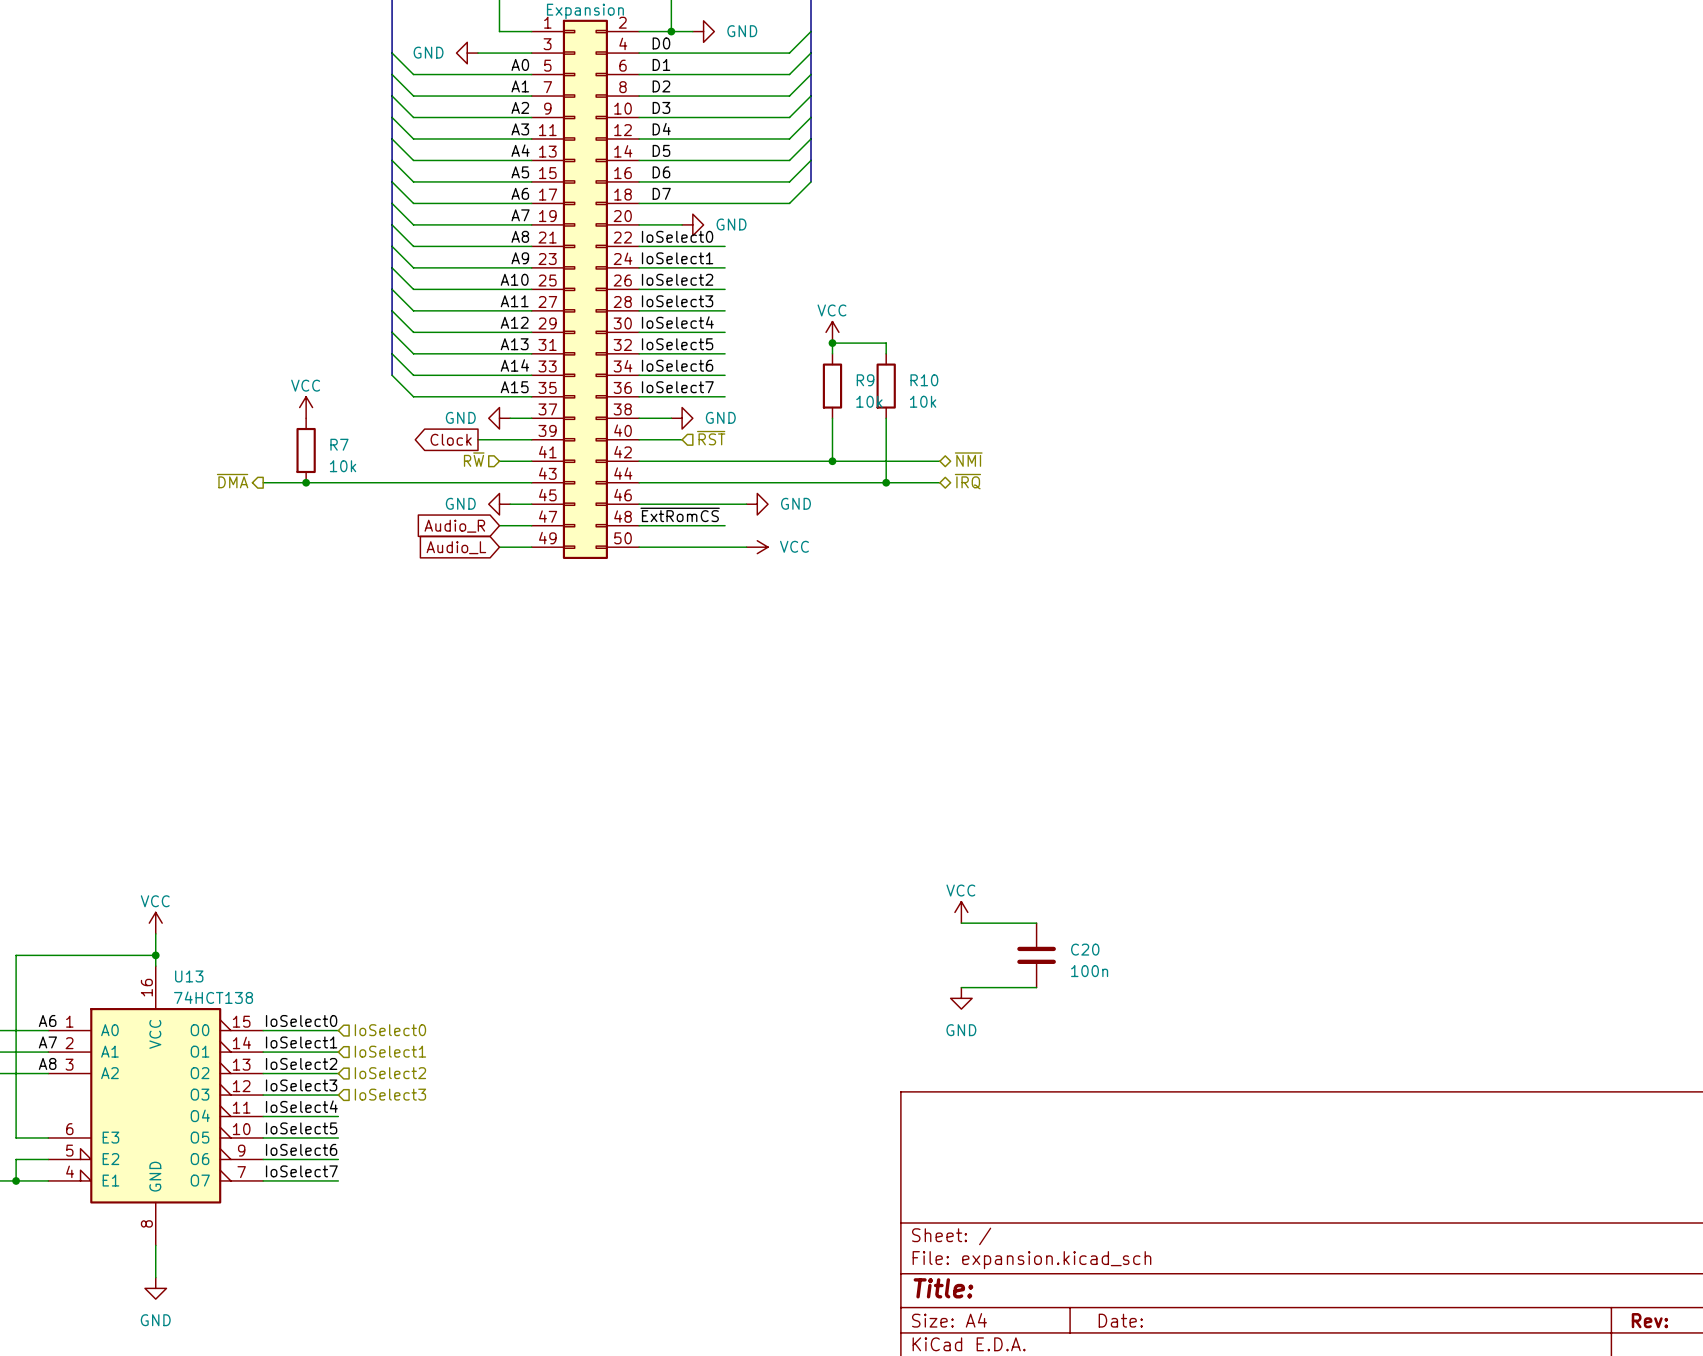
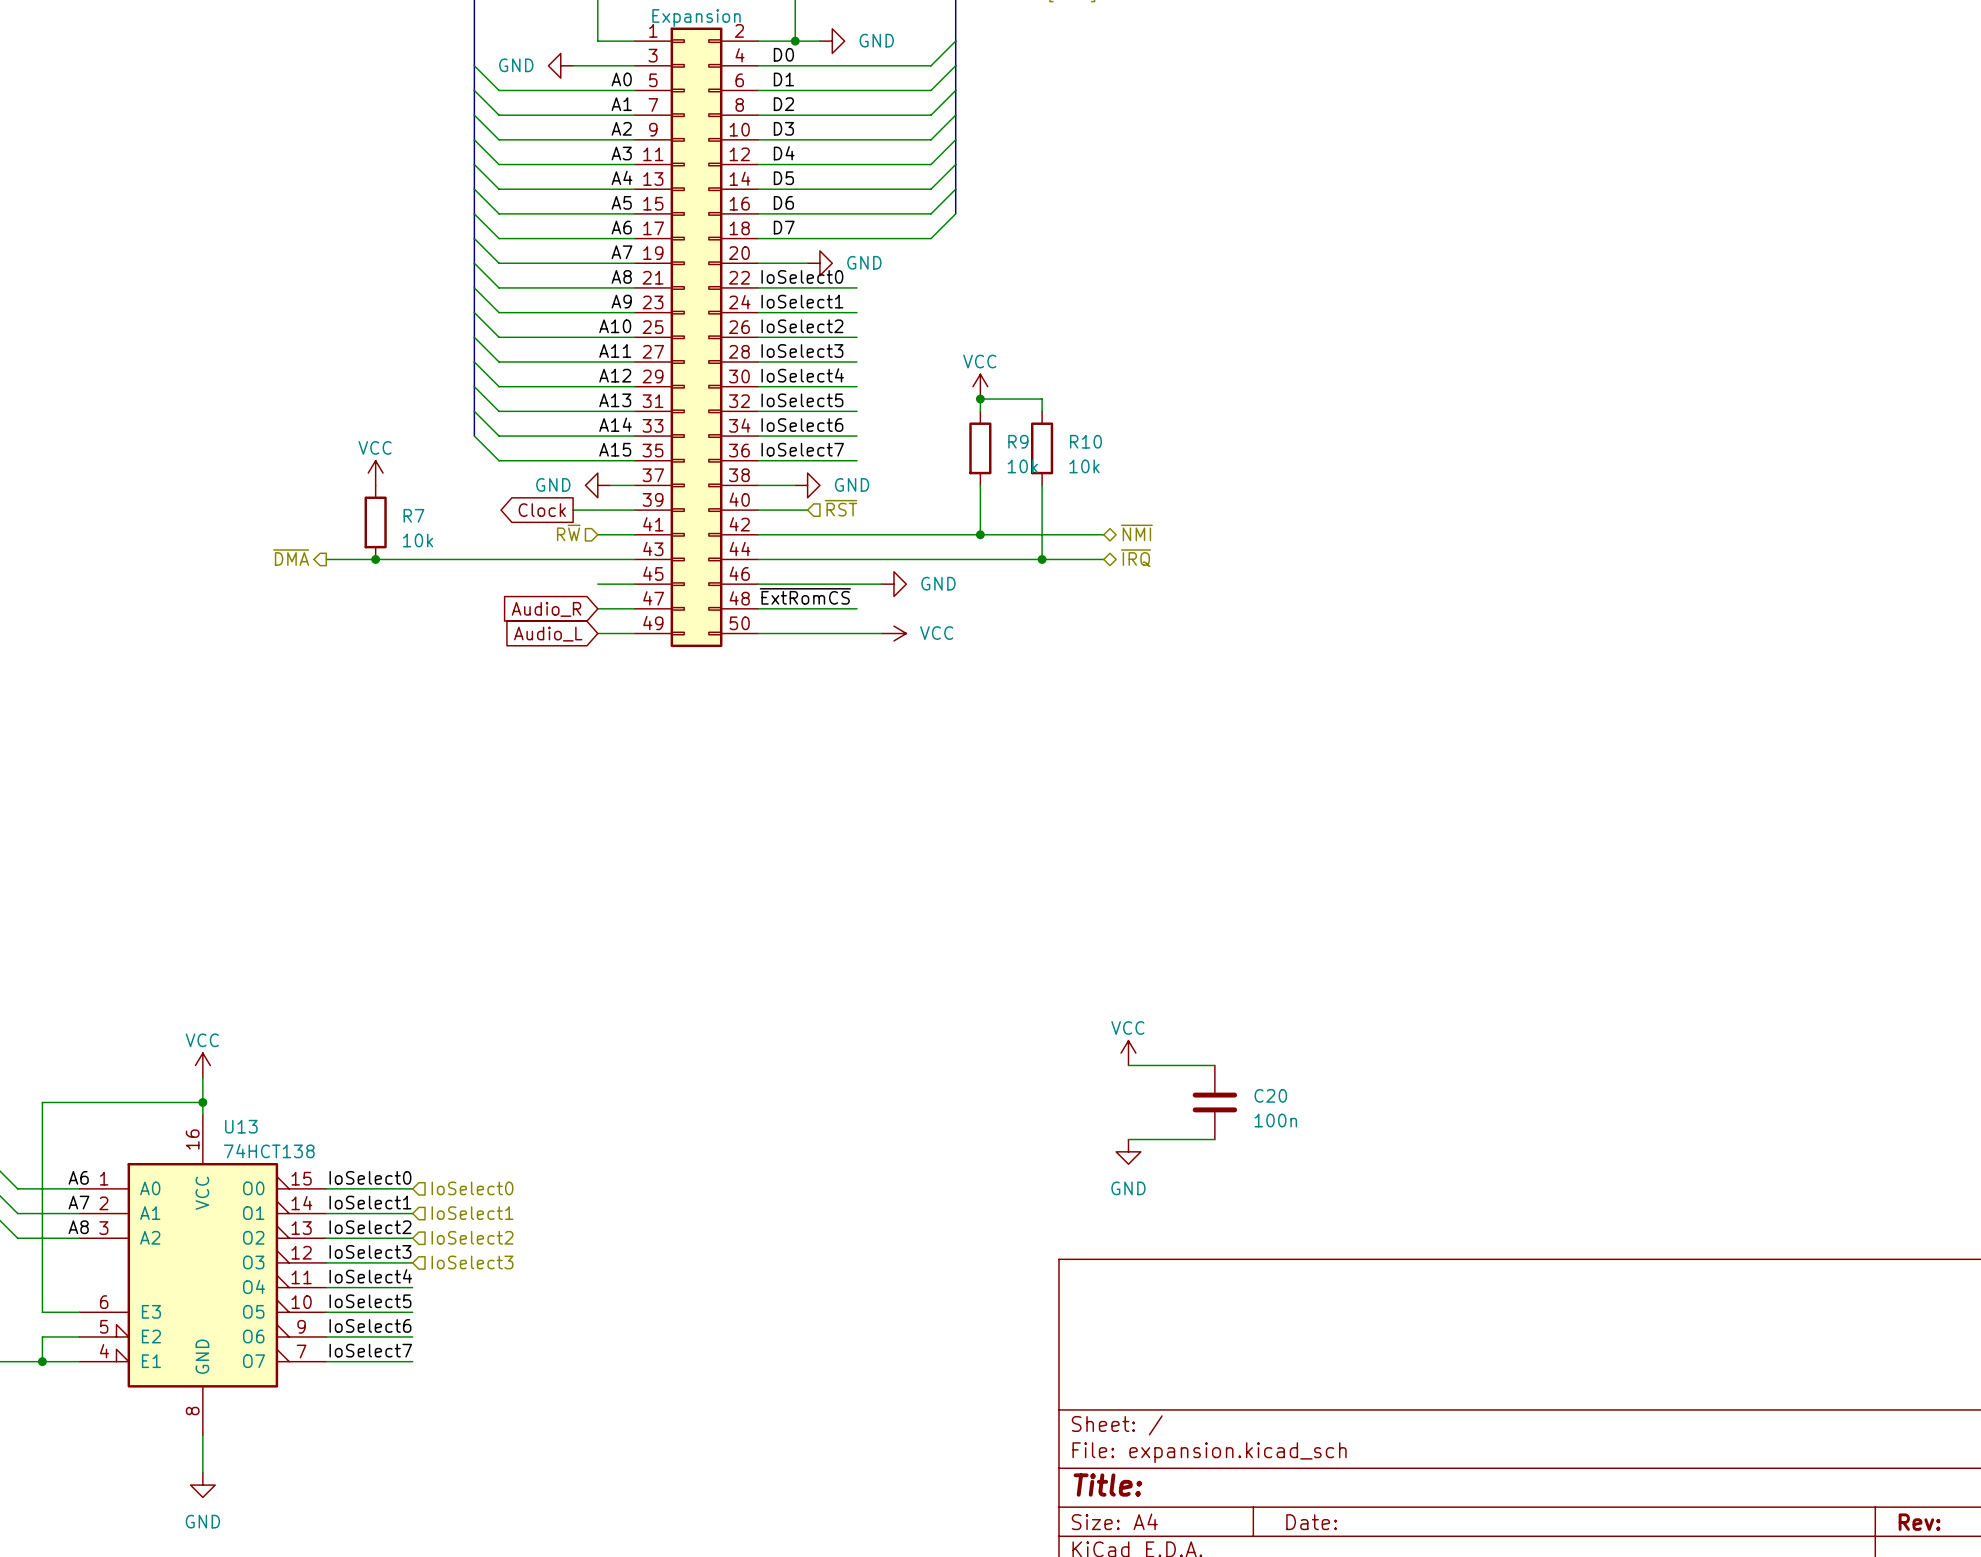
power symbol: GND (499, 504) -> none

